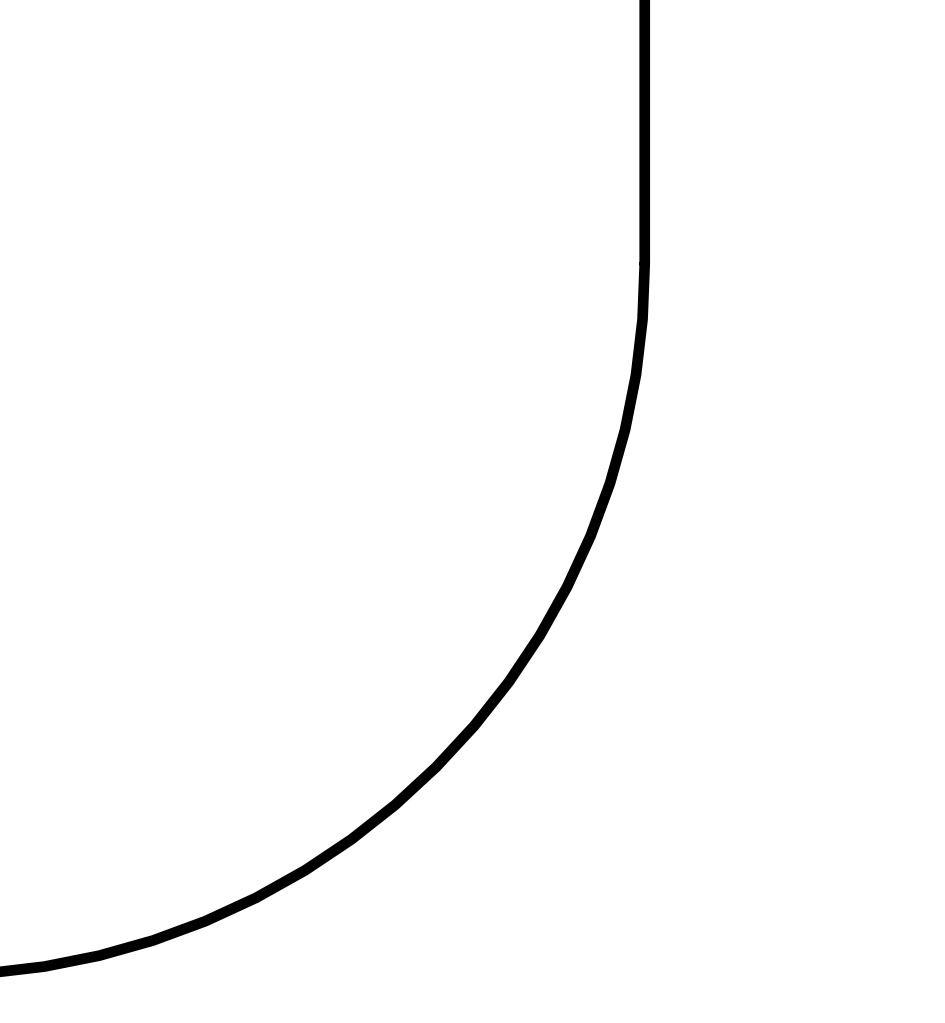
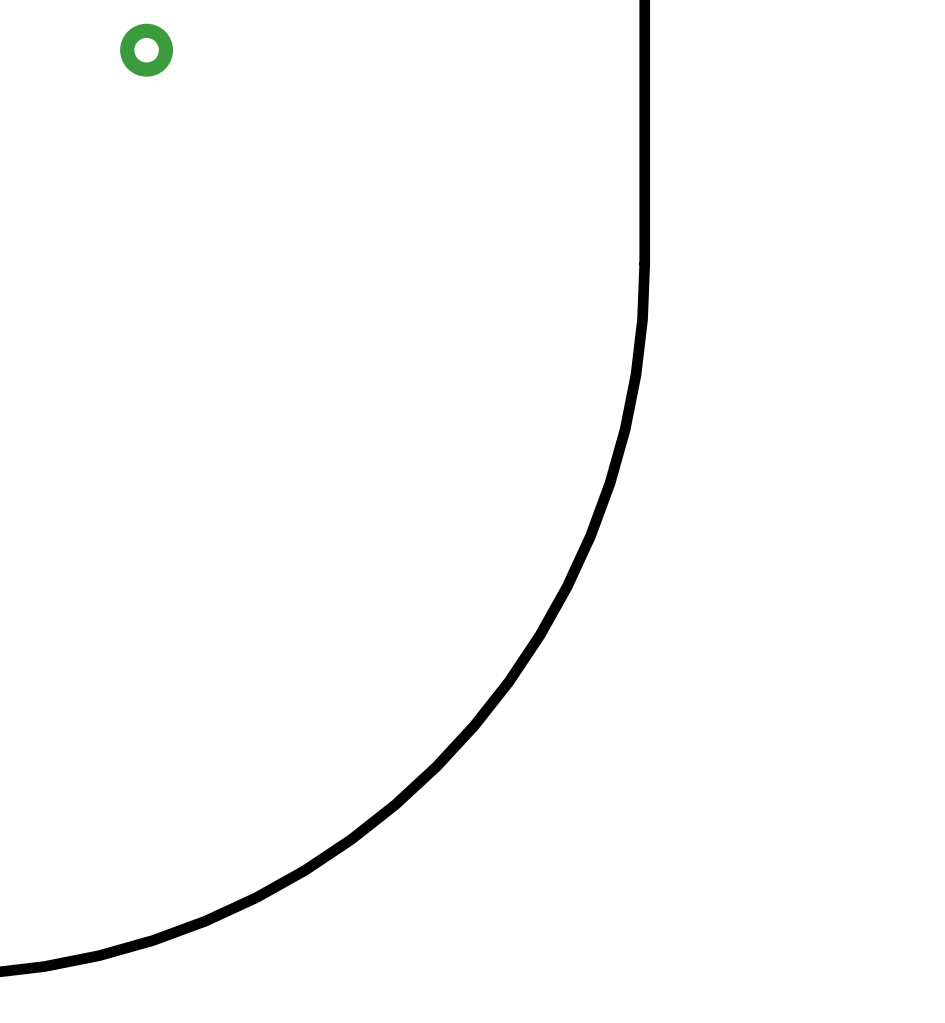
via: none -> (146, 50)

